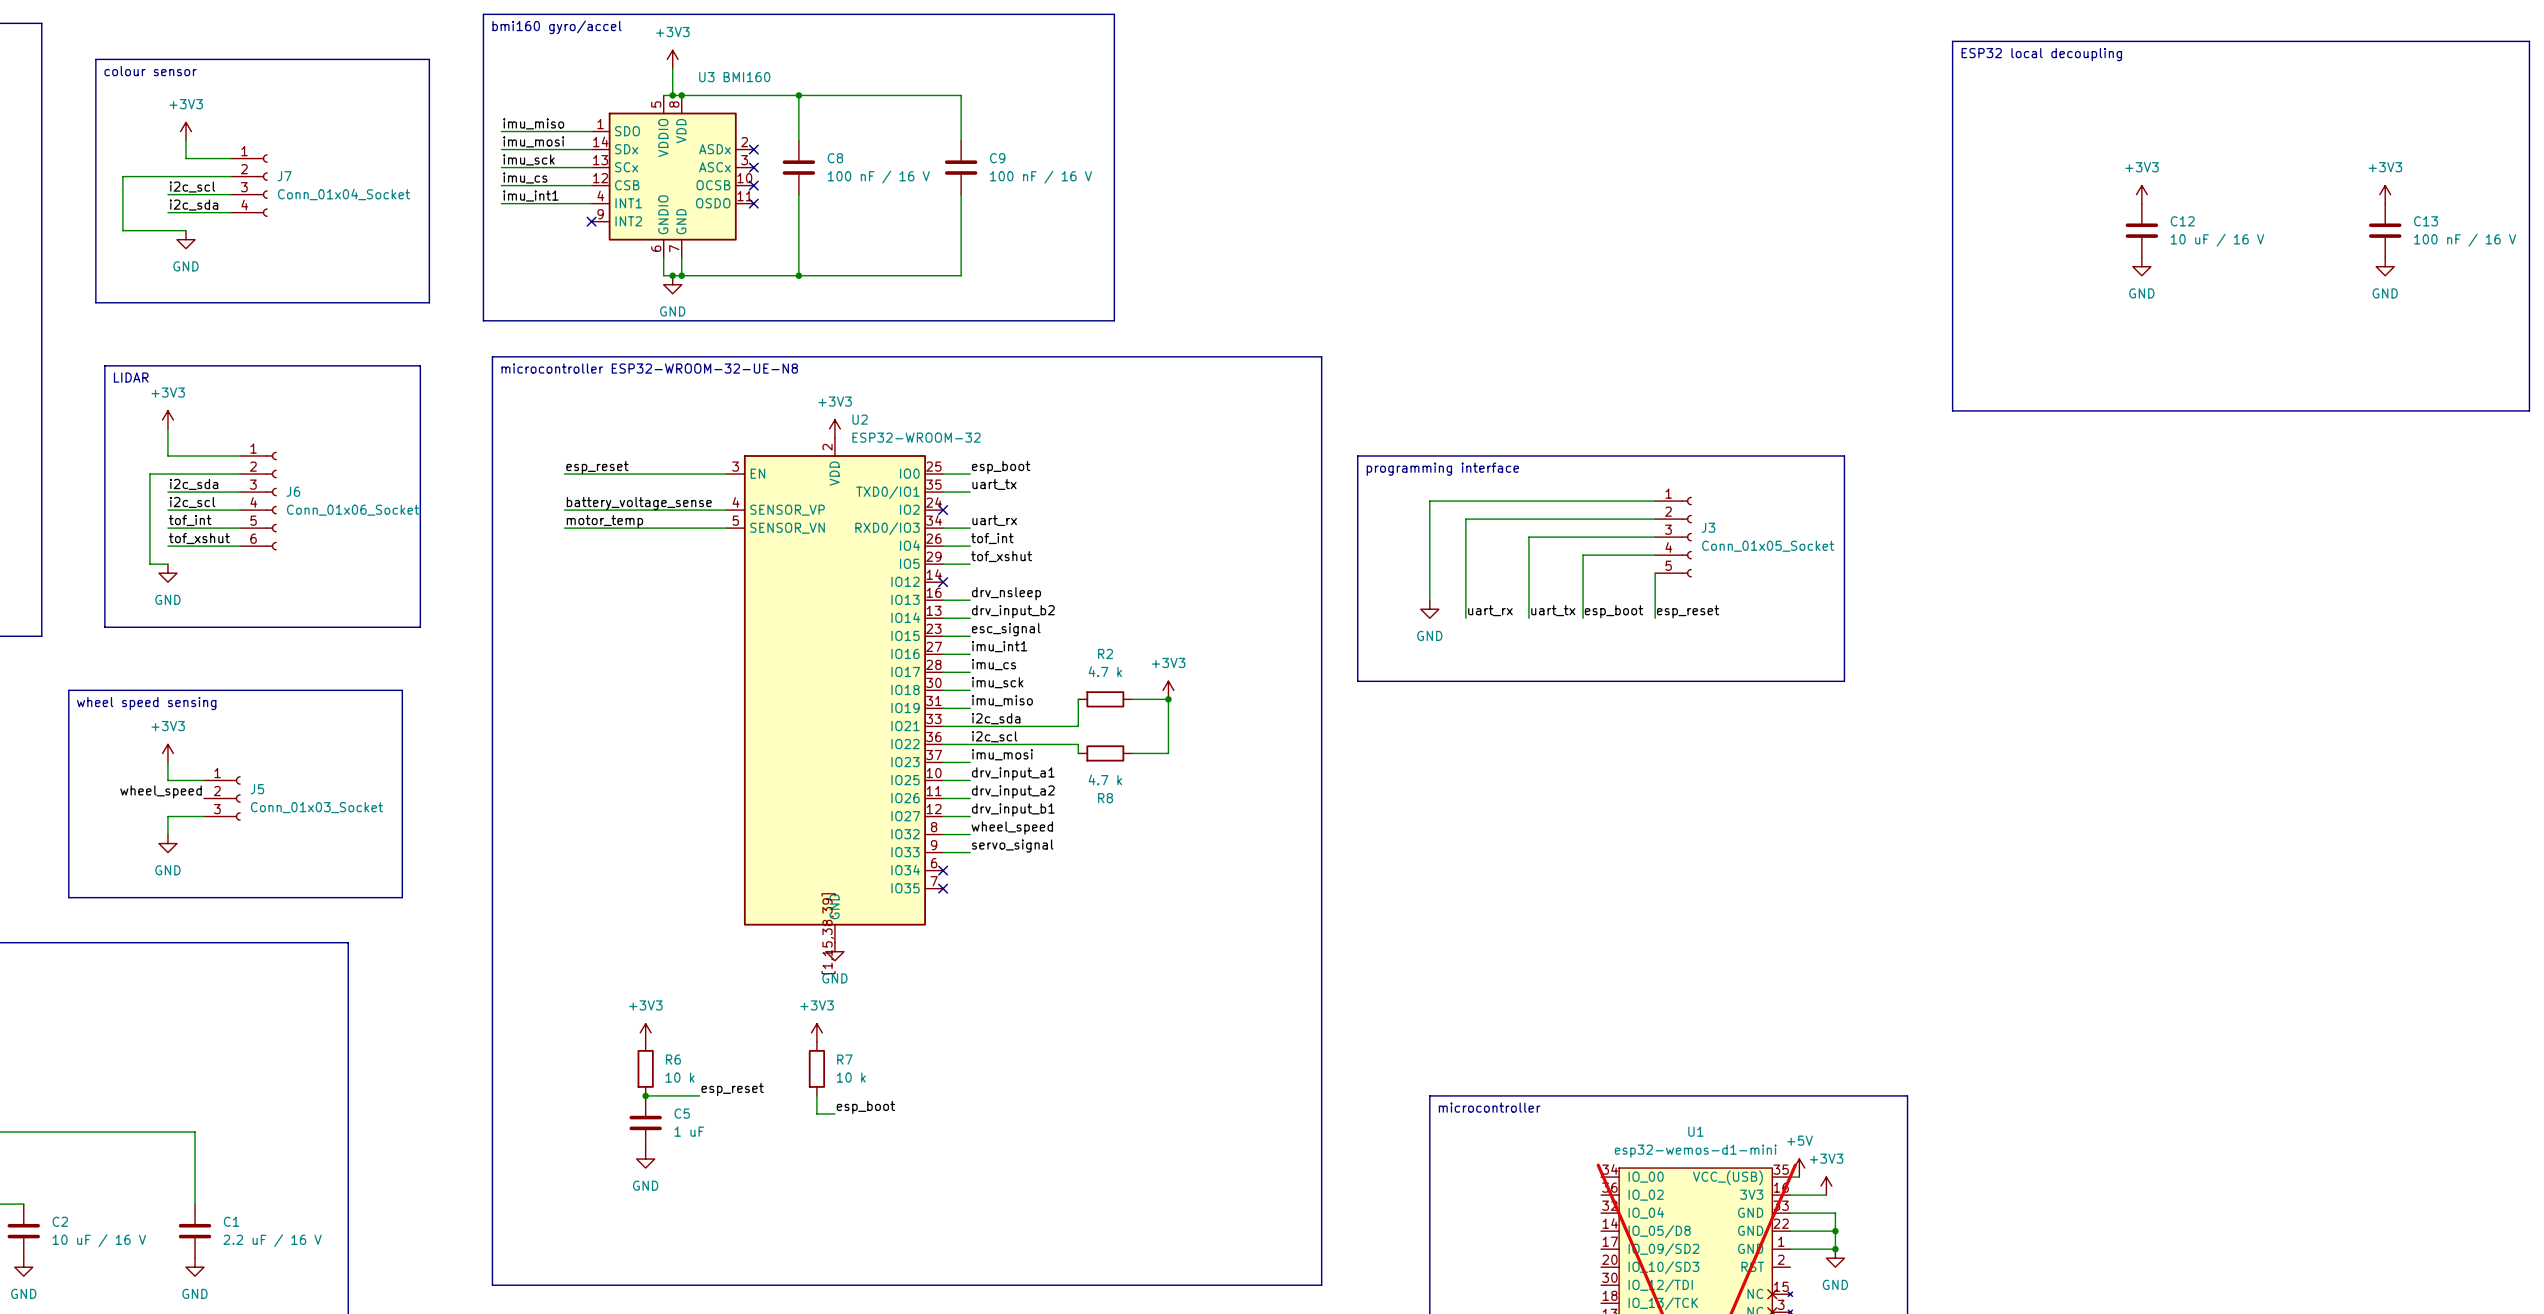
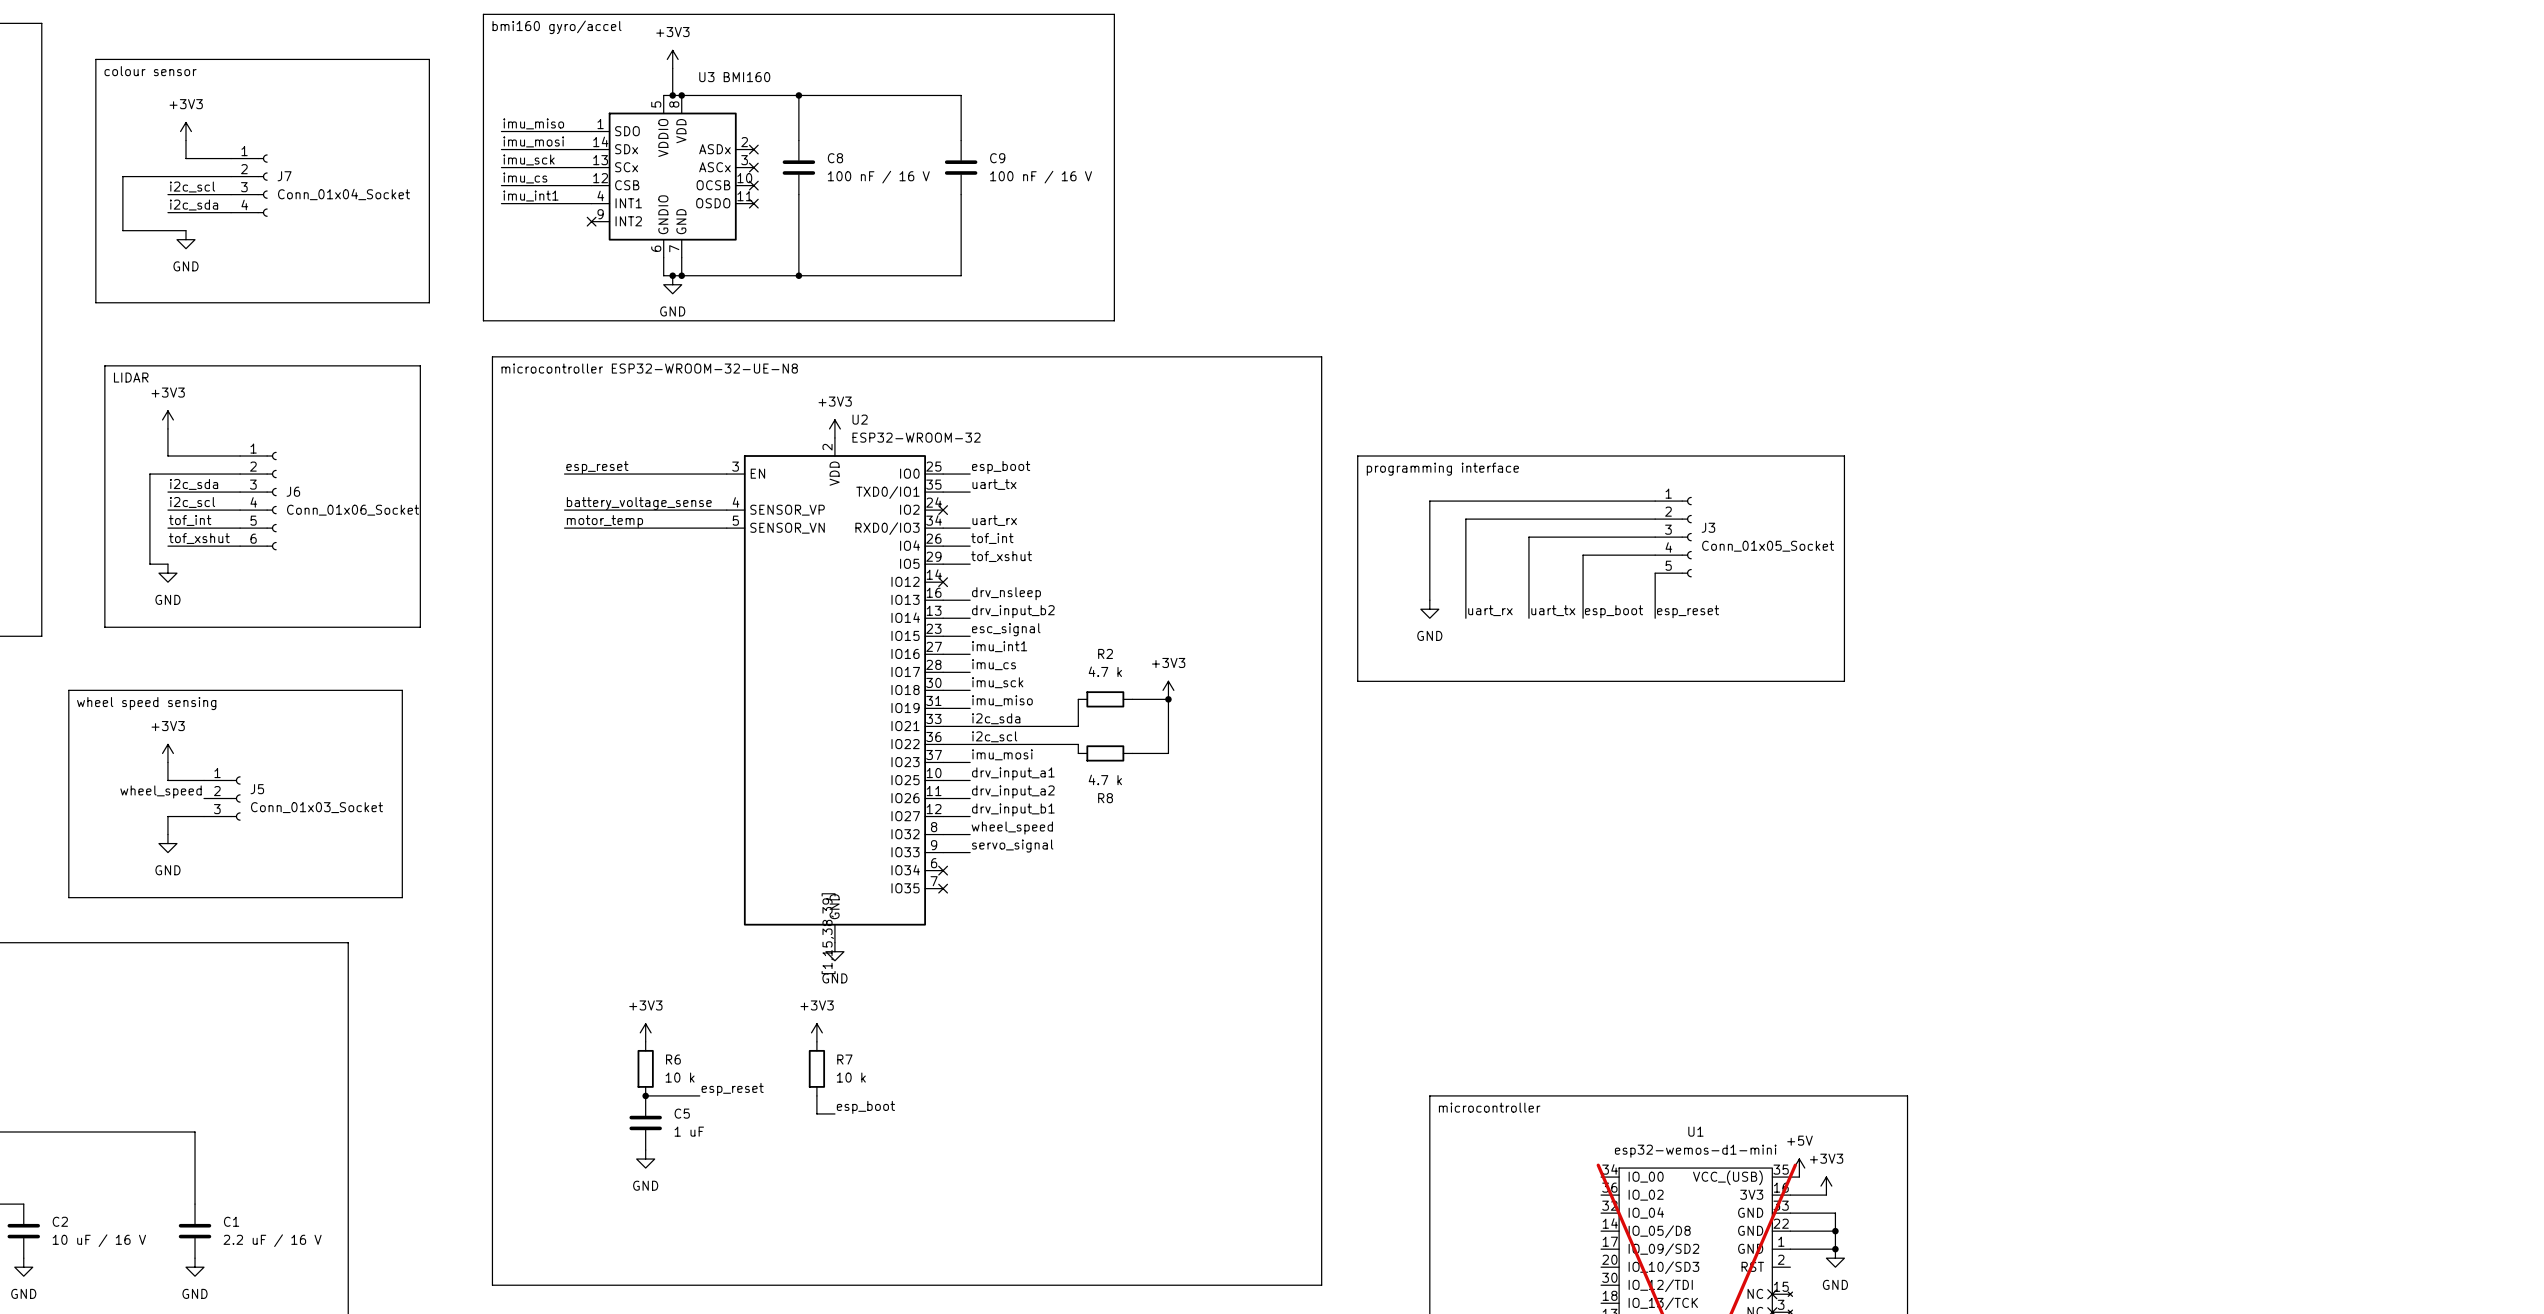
line: (1952, 41) (2529, 41) (2529, 410) (1952, 410) (1952, 41) -> none
text: ESP32 local decoupling (2041, 54) -> none
power symbol: +3V3 (2141, 194) -> none
power symbol: +3V3 (2385, 194) -> none
C12: 10 uF / 16 V (2141, 230) -> none
C13: 100 nF / 16 V (2385, 230) -> none
power symbol: GND (2141, 266) -> none
power symbol: GND (2385, 266) -> none

